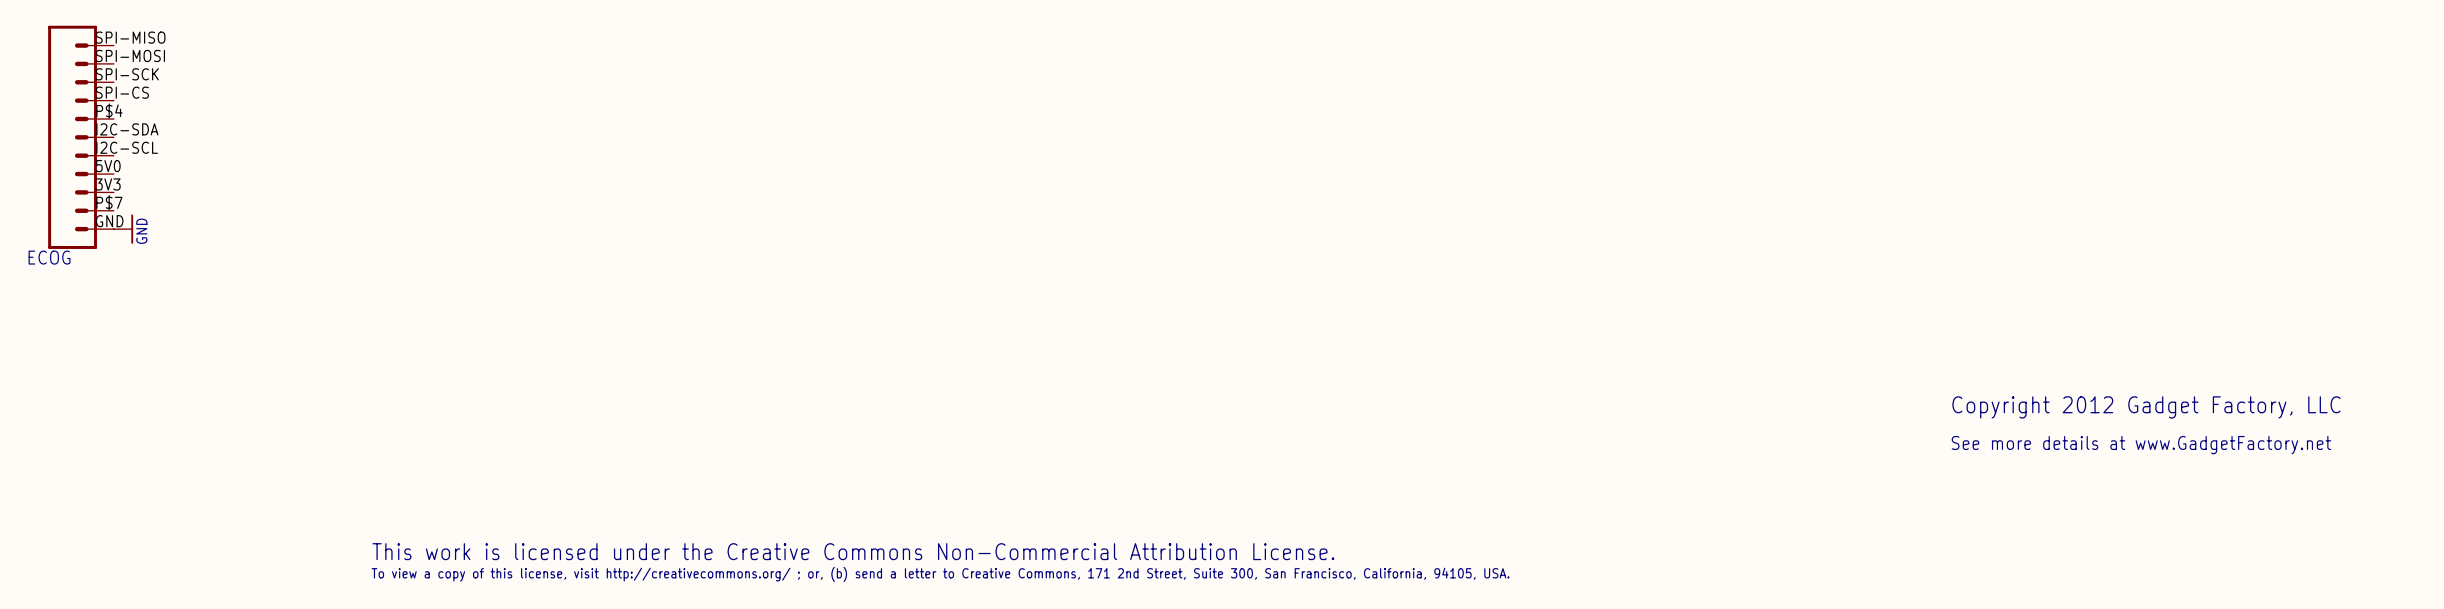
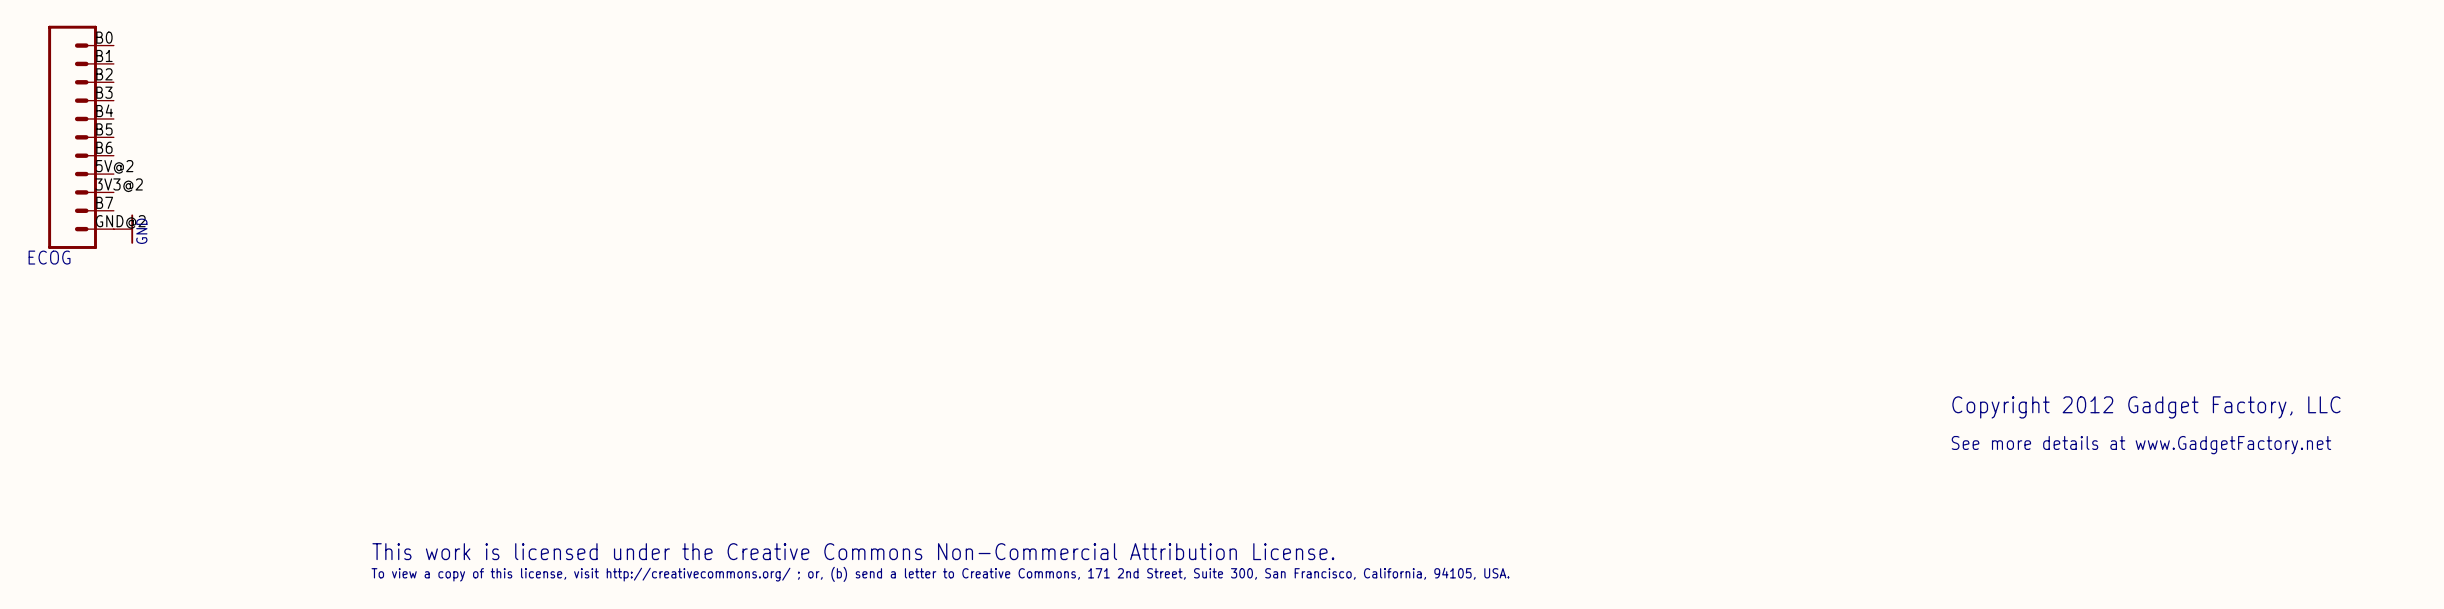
ECOG symbol: [48, 25, 114, 249] -> [48, 25, 114, 249]

